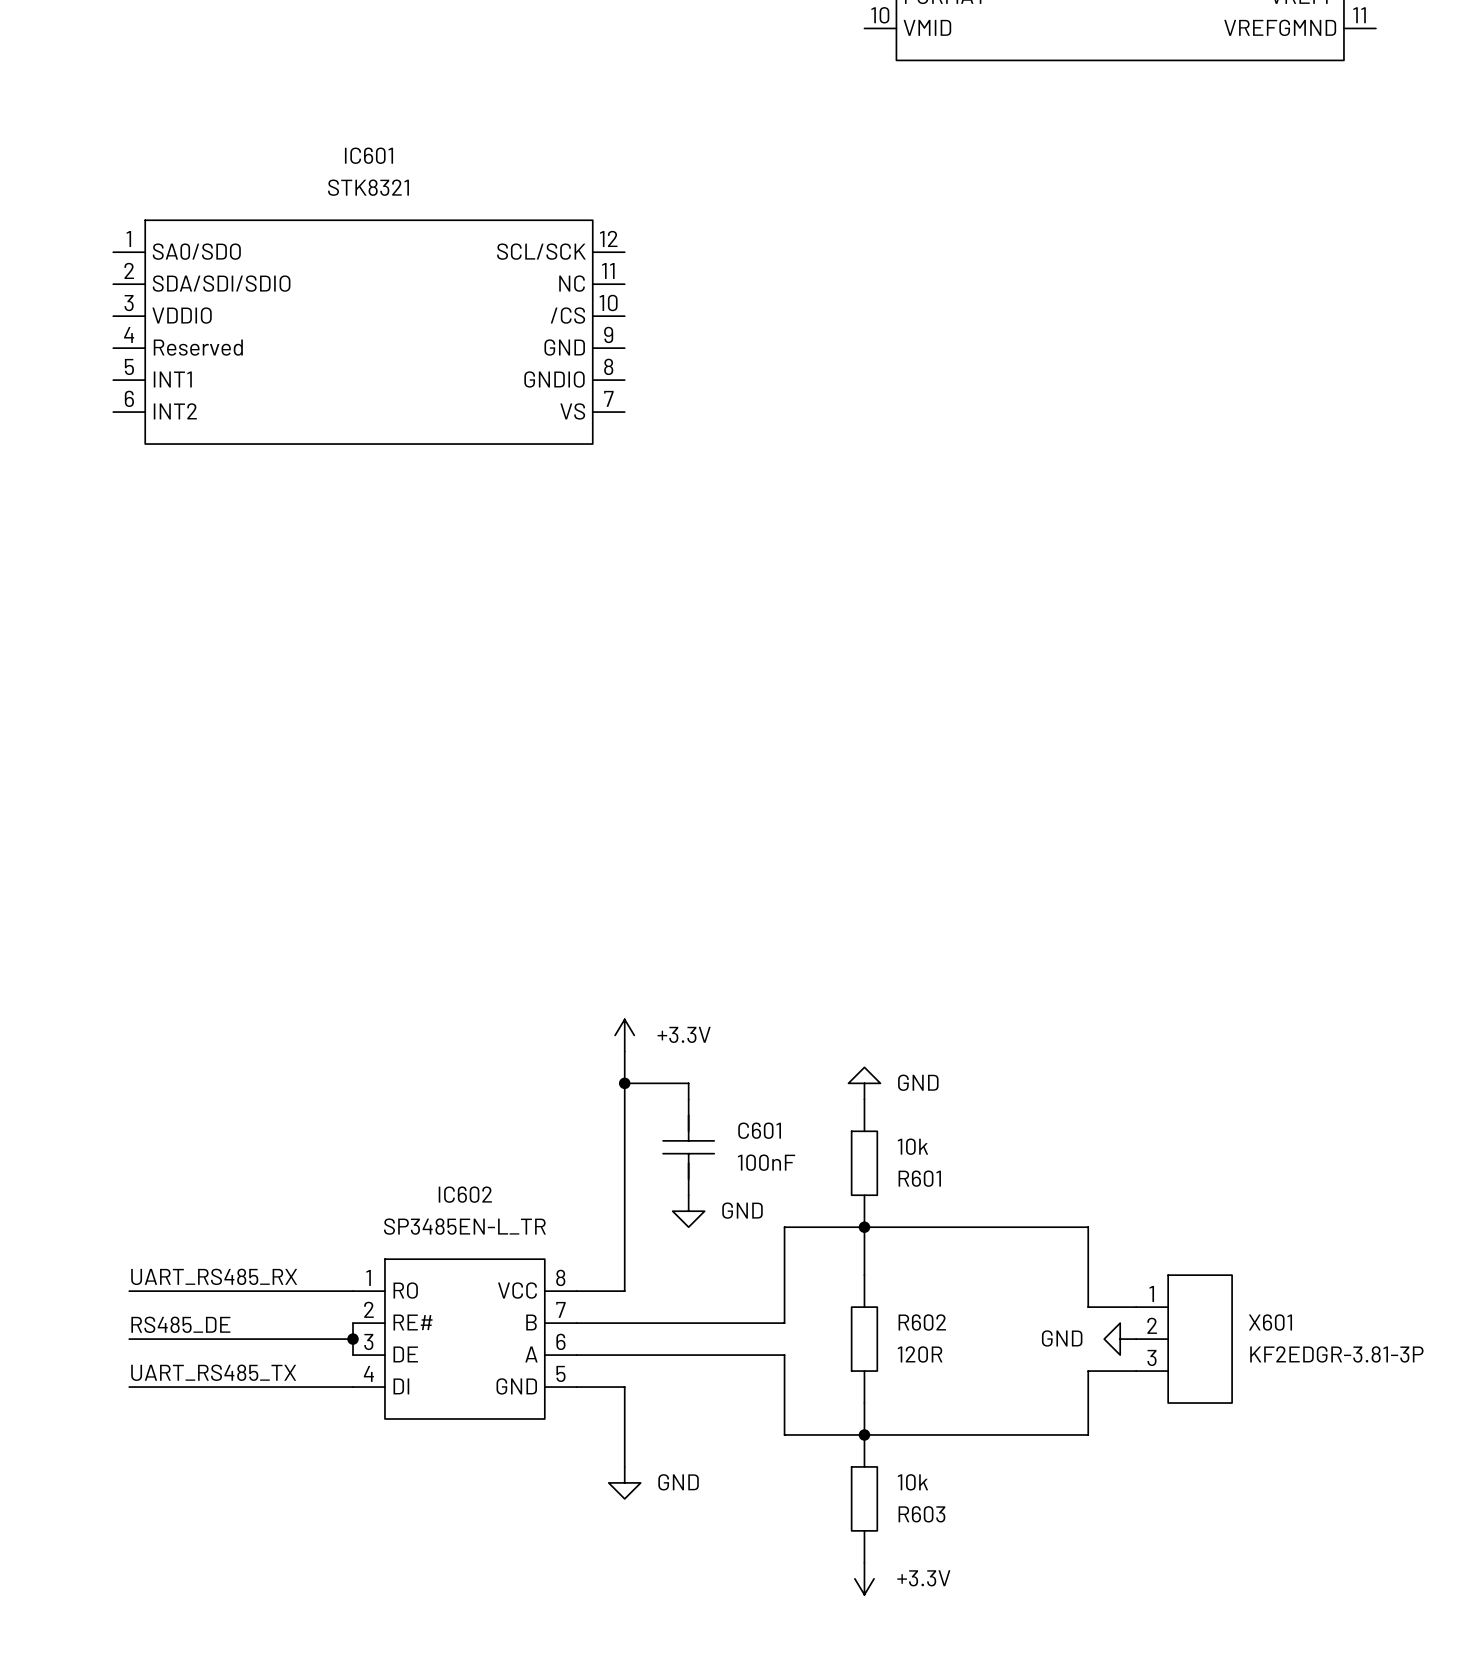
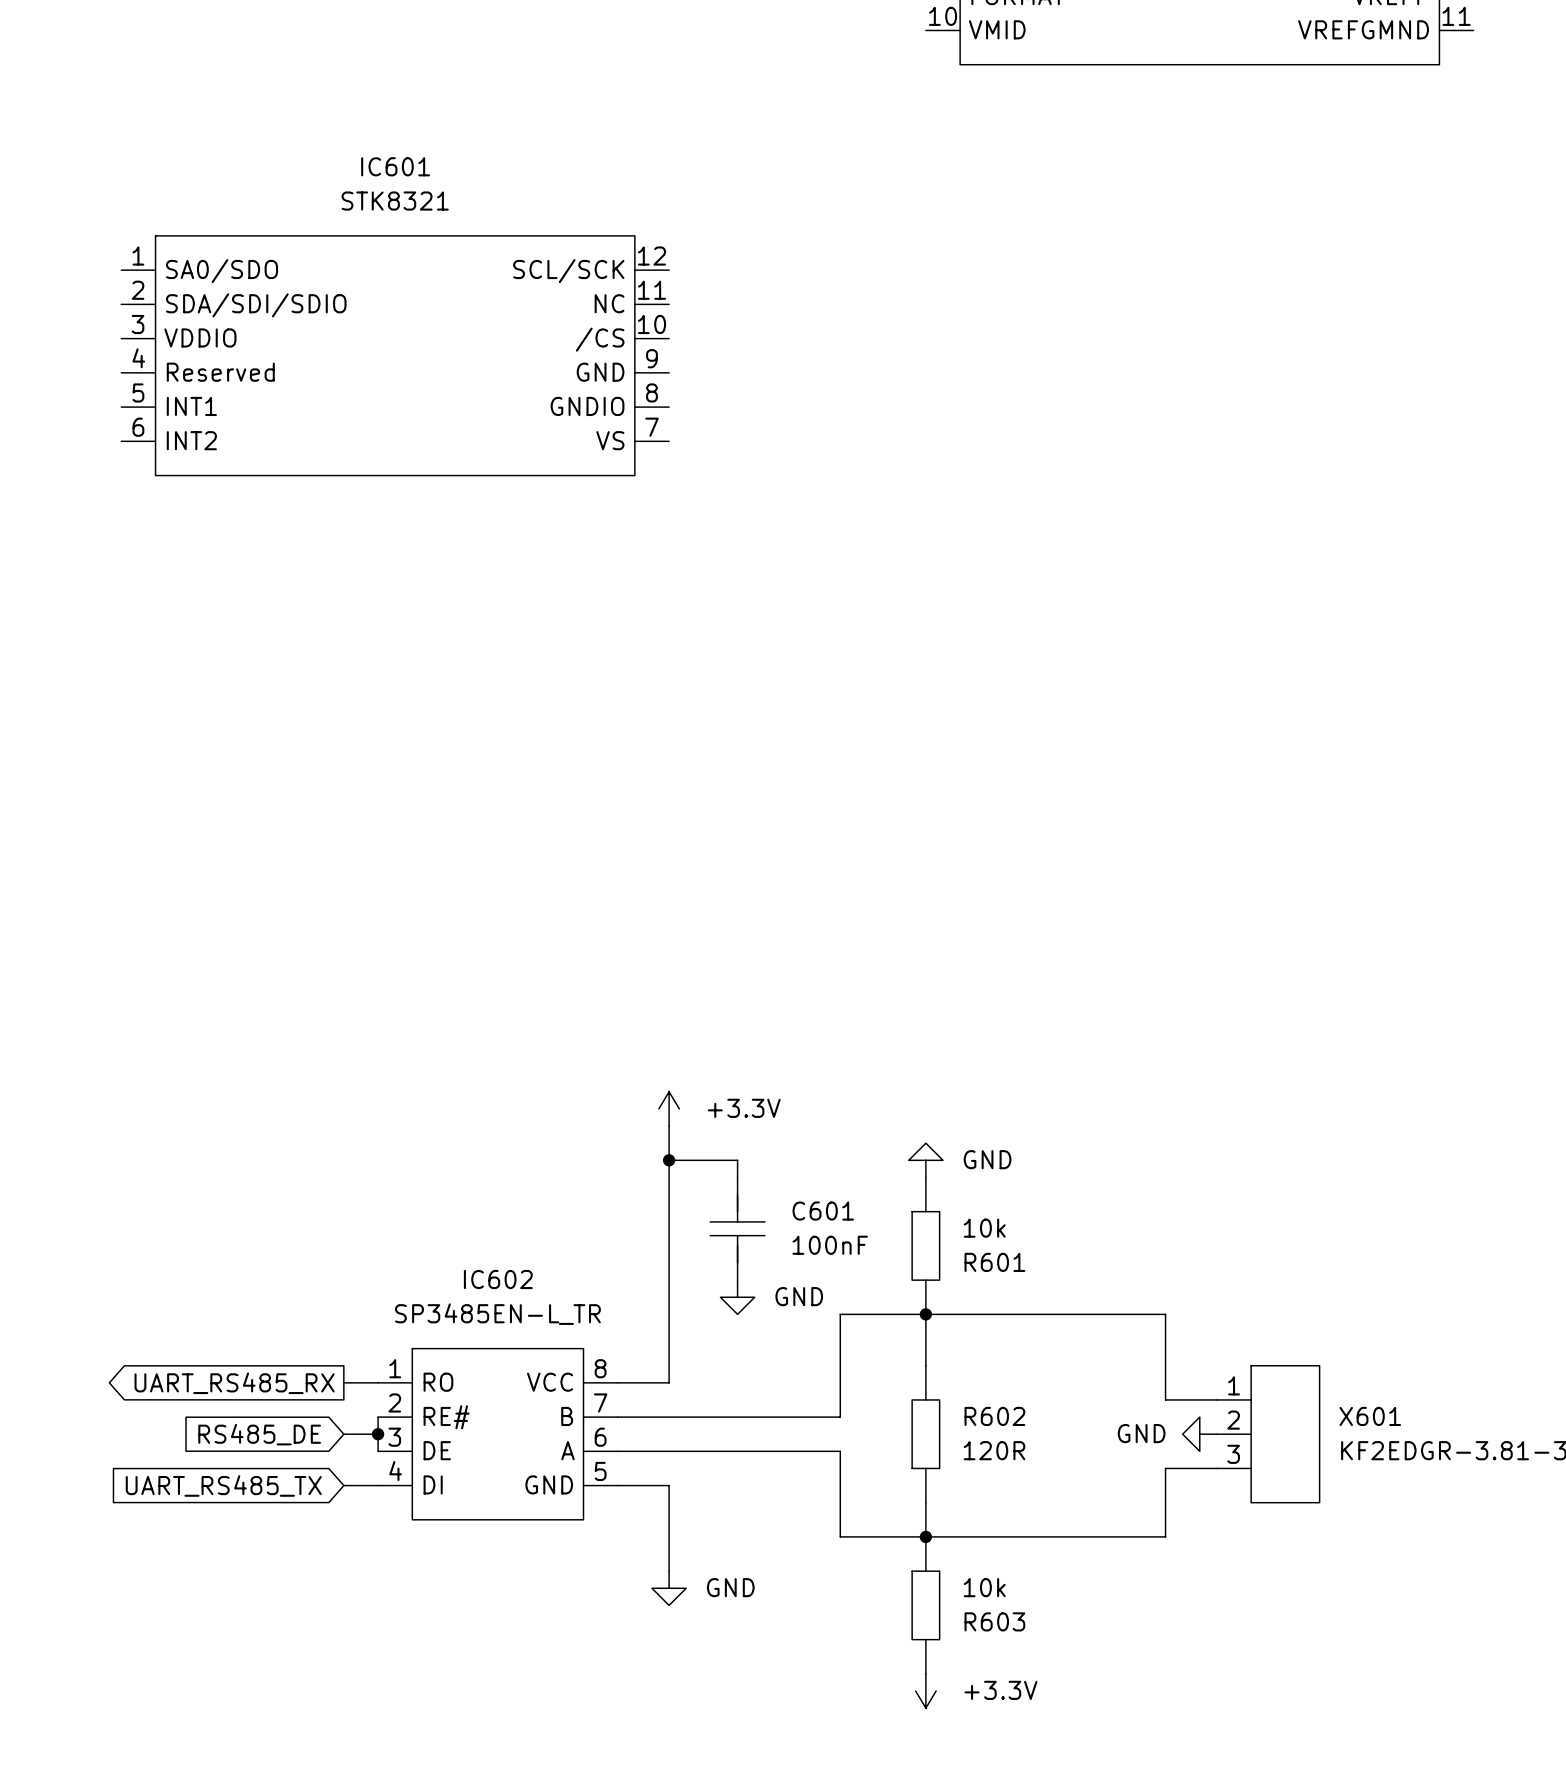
label: UART_RS485_RX (214, 1276) -> none
wire: (129, 1291) (321, 1291) -> none
global label: none -> UART_RS485_RX (234, 1383)
label: RS485_DE (180, 1324) -> none
wire: (129, 1339) (321, 1339) -> none
global label: none -> RS485_DE (259, 1434)
label: UART_RS485_TX (213, 1372) -> none
wire: (129, 1387) (321, 1387) -> none
global label: none -> UART_RS485_TX (223, 1485)

